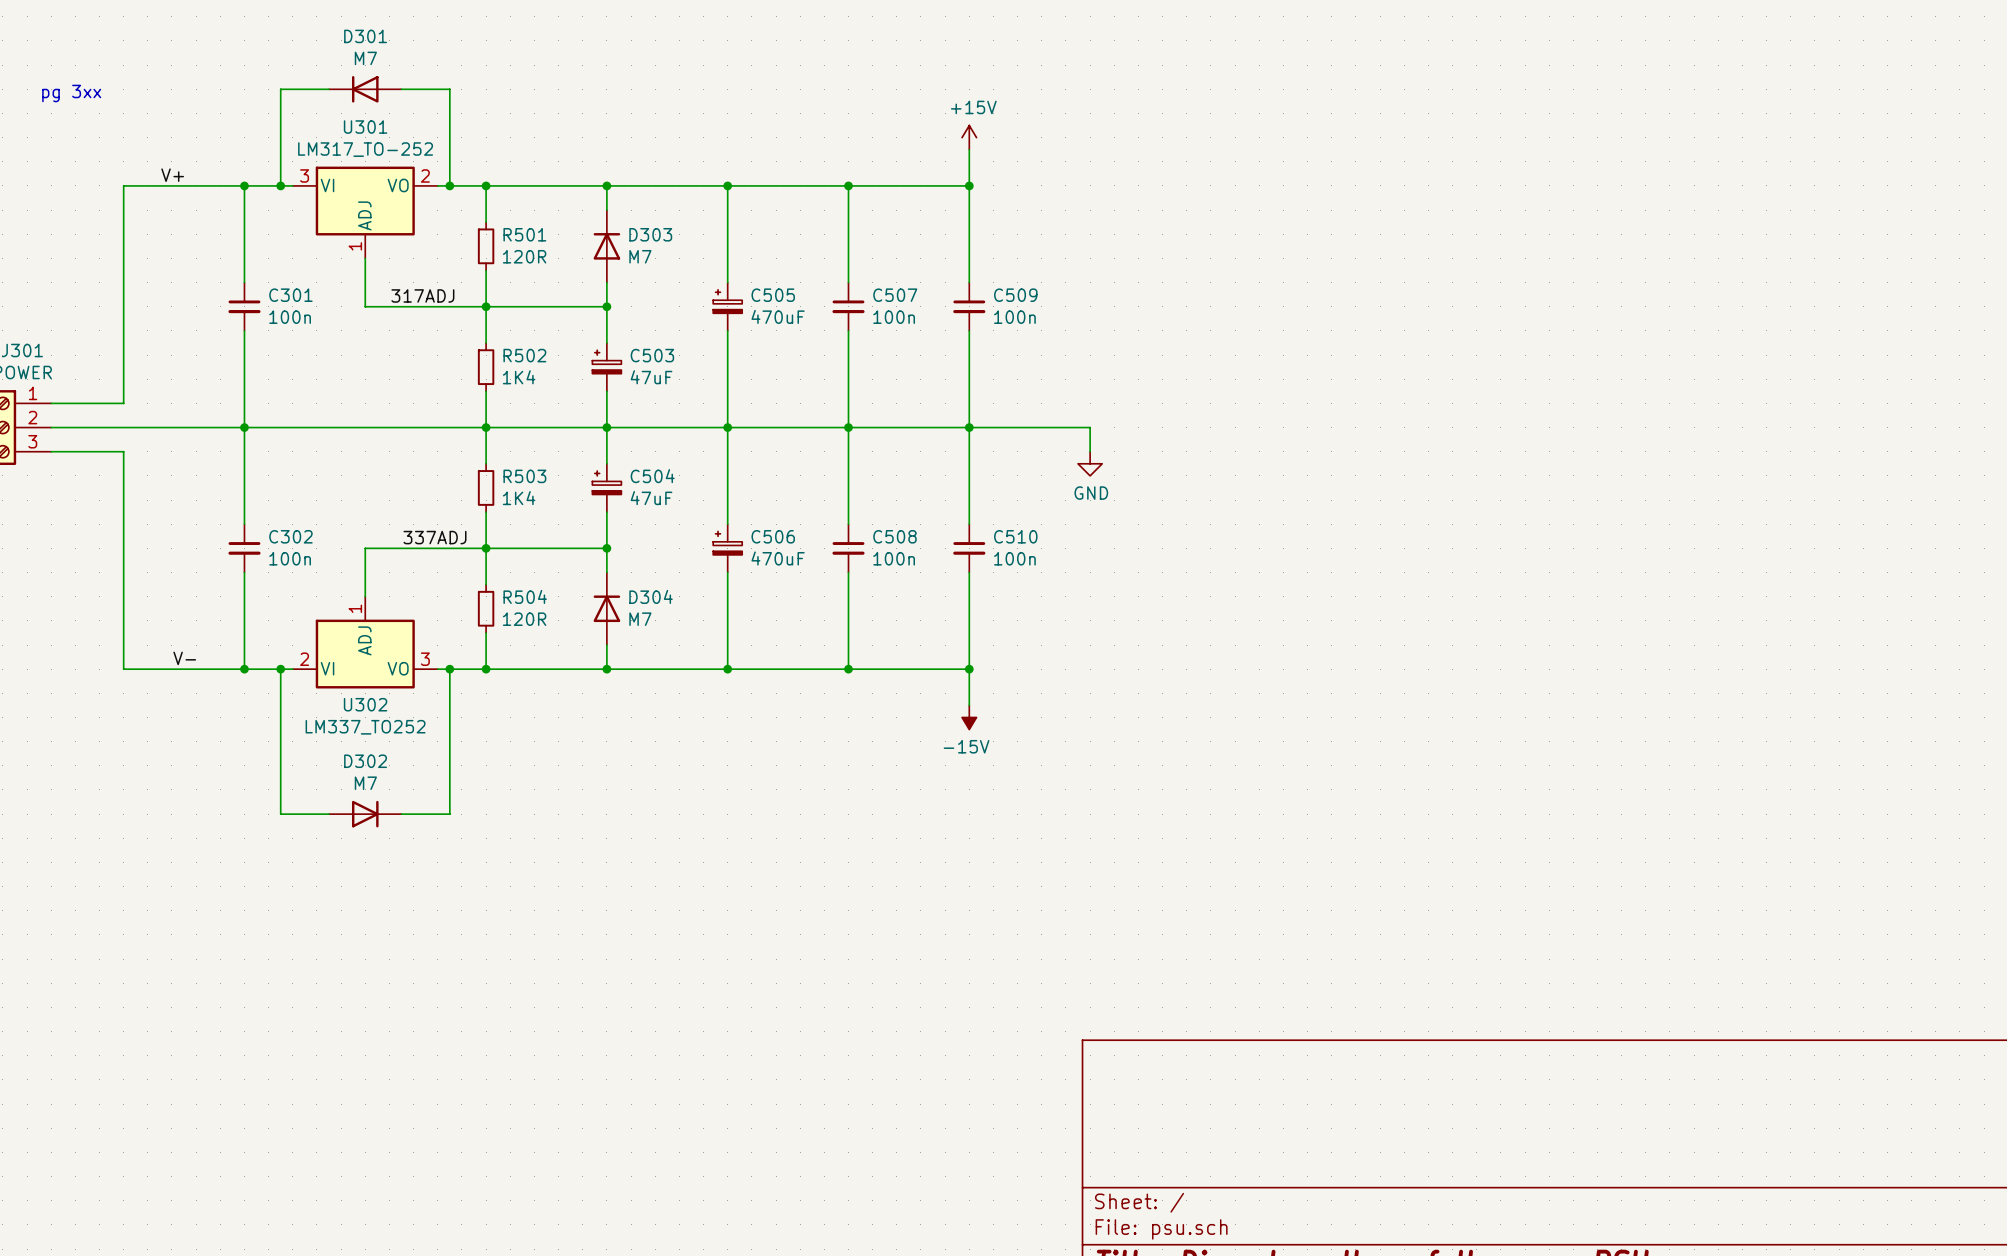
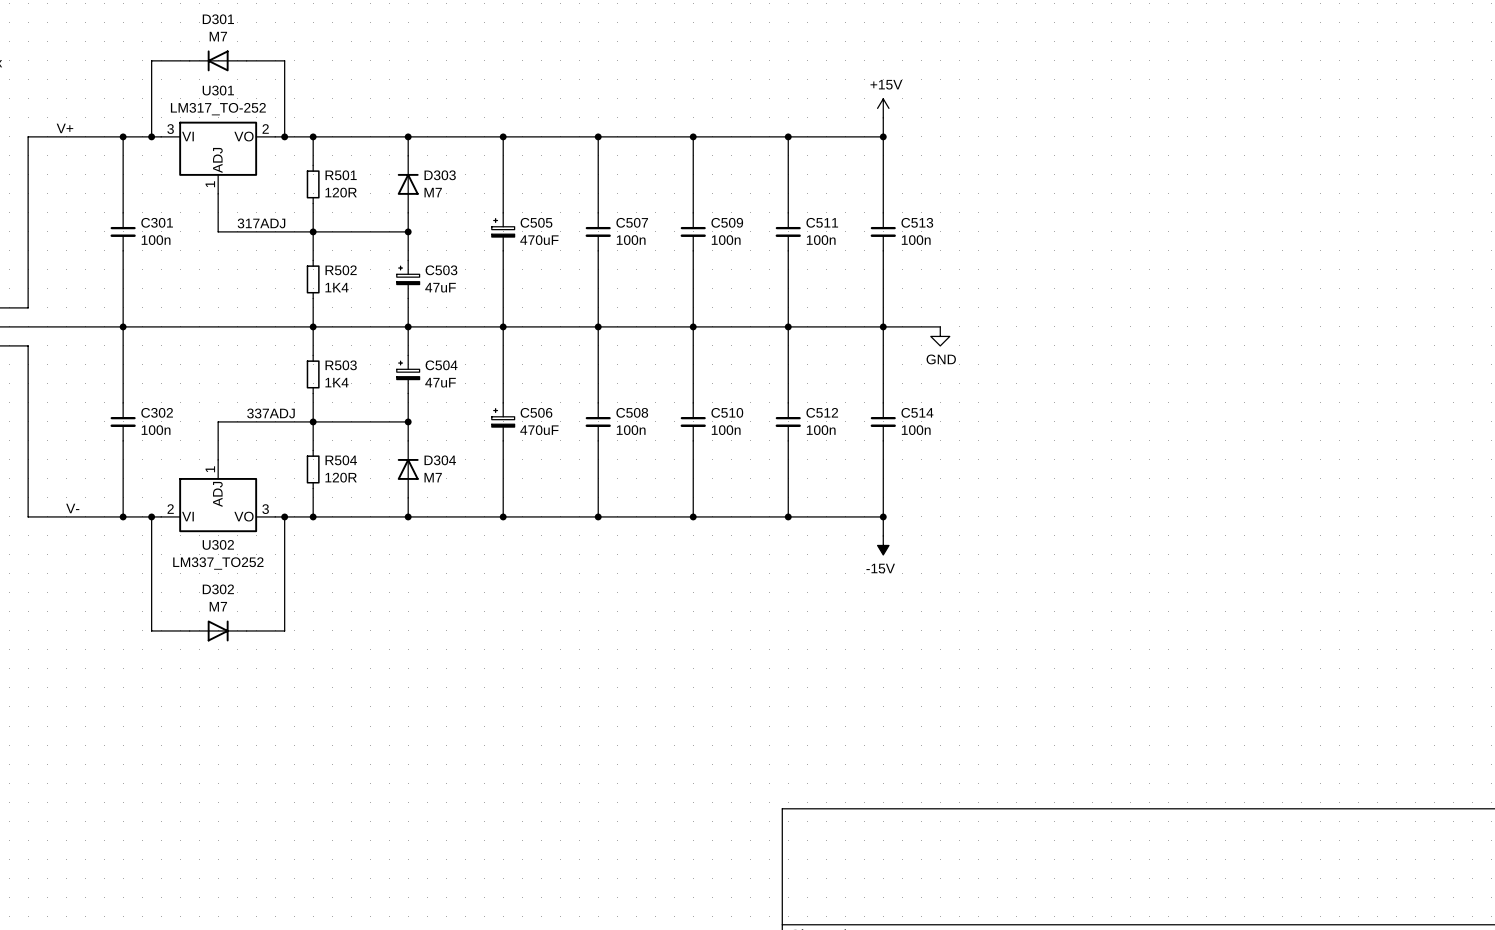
power symbol: +15V (969, 137) -> none
wire: (969, 149) (969, 185) -> (883, 136) (693, 136)
power symbol: none -> +15V (883, 108)
wire: none -> (883, 117) (883, 212)
wire: none -> (788, 136) (788, 212)
junction: none -> (788, 136)
junction: none -> (883, 136)
C511: none -> 100n (788, 231)
C513: none -> 100n (883, 231)
wire: none -> (788, 250) (788, 326) (940, 326)
wire: none -> (883, 250) (883, 402)
junction: none -> (788, 326)
junction: none -> (883, 326)
wire: none -> (788, 345) (788, 402)
power symbol position: GND (1090, 463) -> GND (940, 336)
C512: none -> 100n (788, 421)
C514: none -> 100n (883, 421)
wire: none -> (788, 440) (788, 516)
wire: none -> (883, 440) (883, 535)
wire: (969, 669) (969, 705) -> (693, 516) (883, 516)
junction: none -> (788, 516)
junction: none -> (883, 516)
power symbol: none -> -15V (883, 545)
power symbol: -15V (969, 717) -> none

